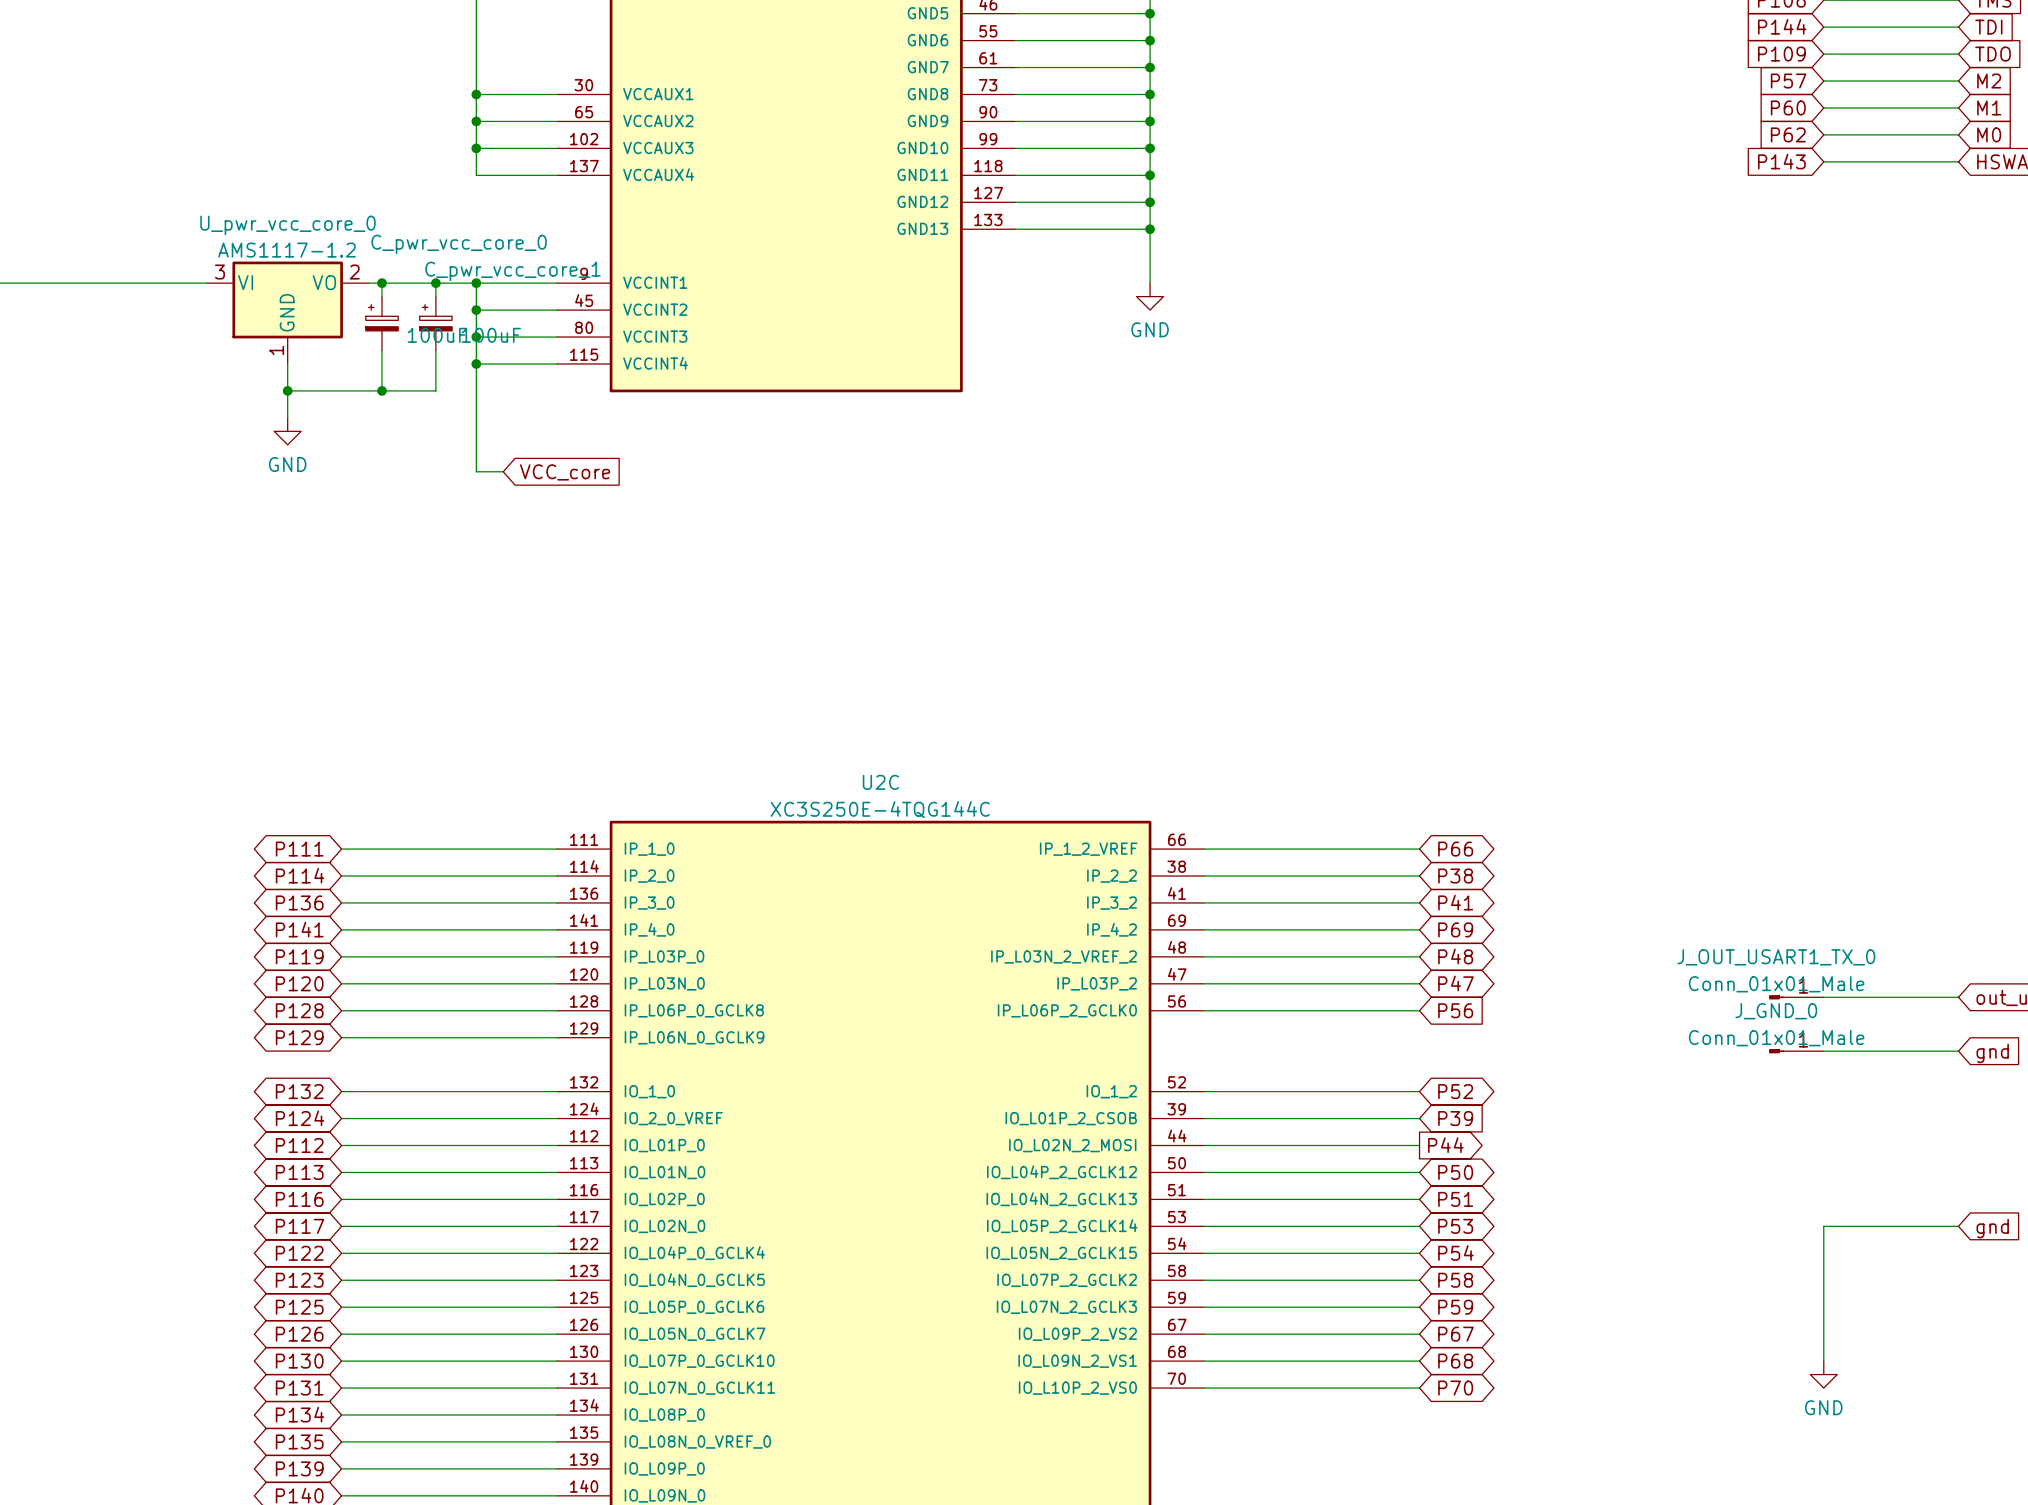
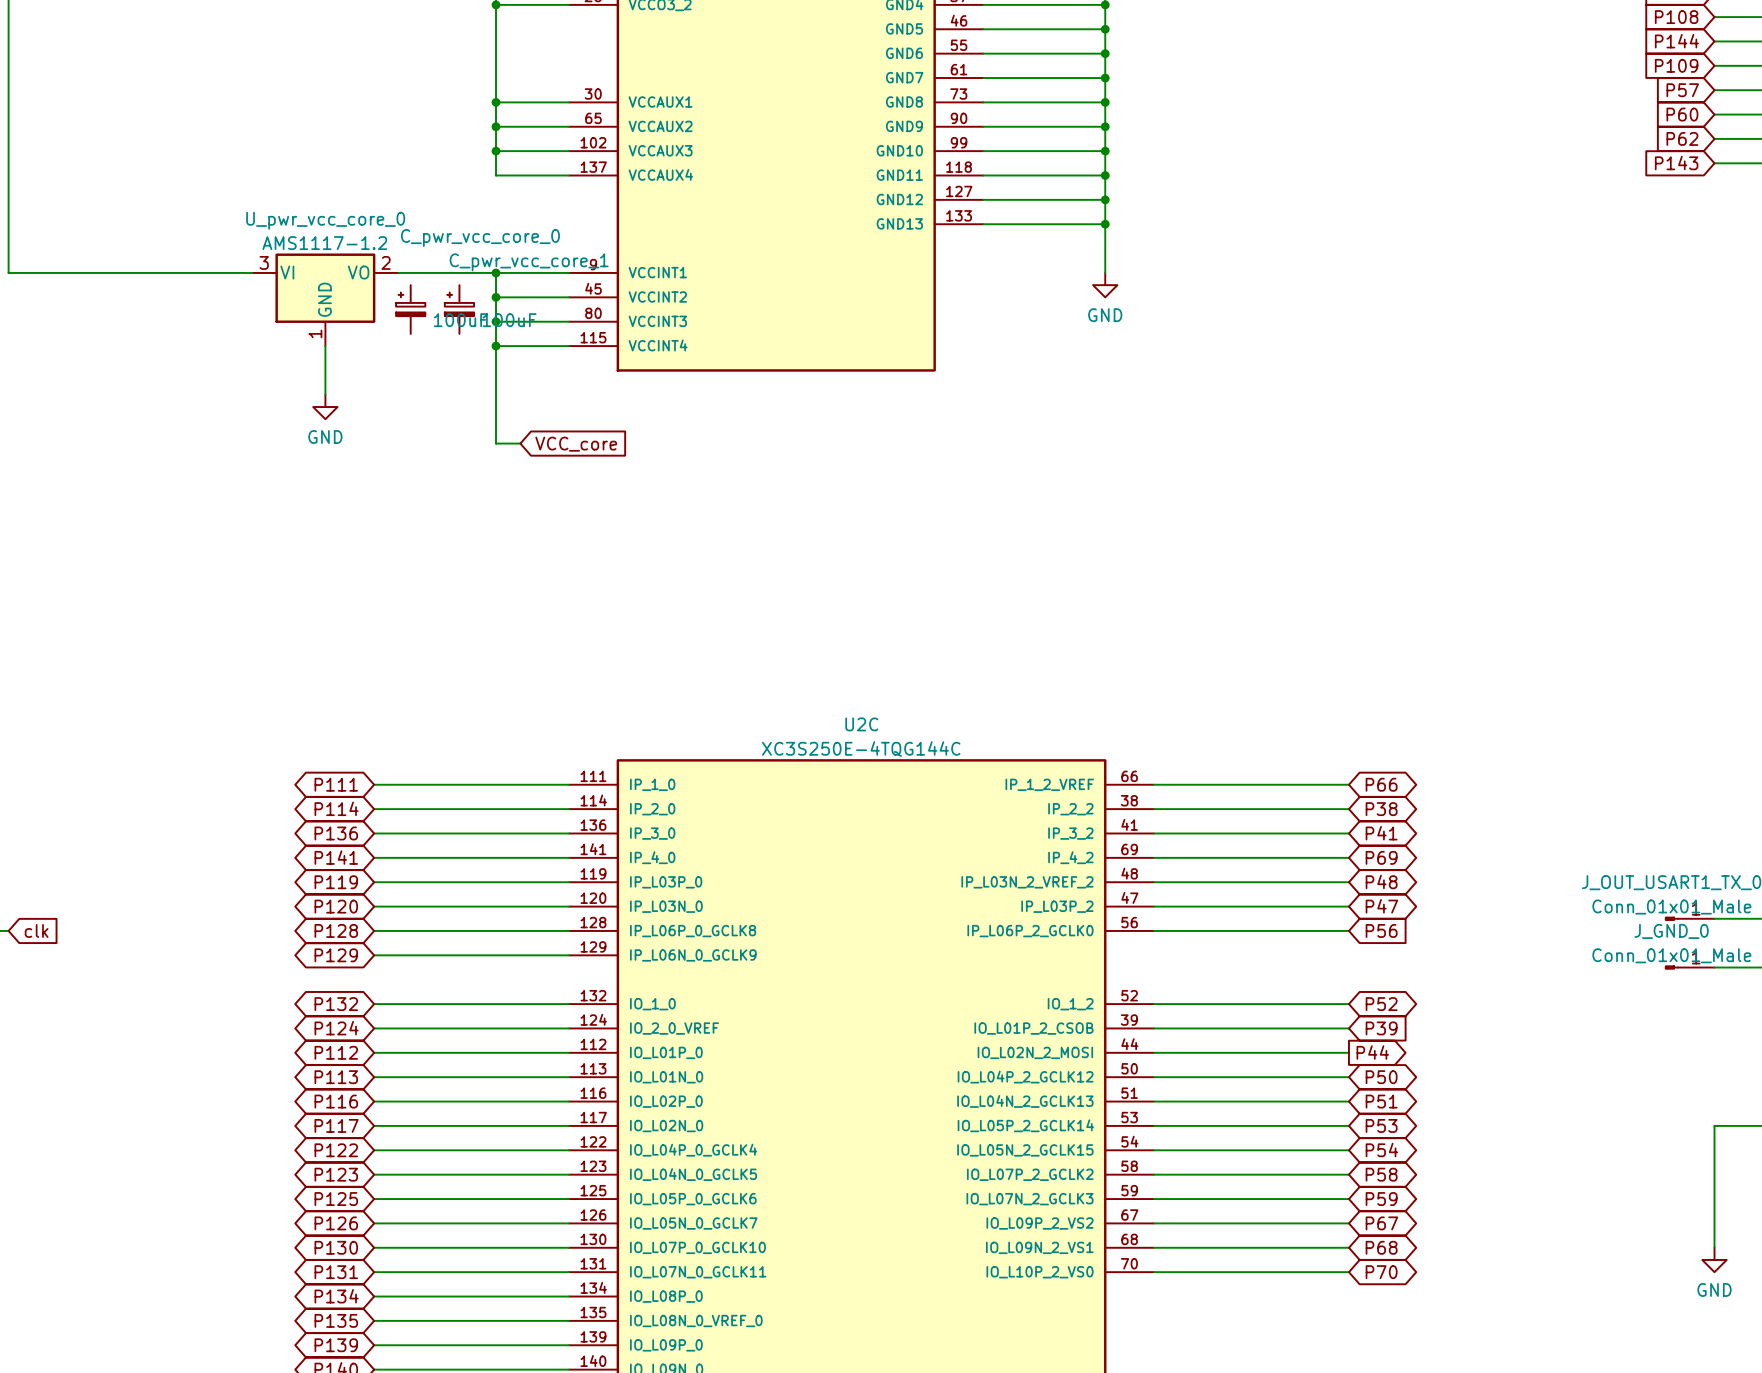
wire: (382, 283) (382, 296) -> none
junction: (382, 283) -> none
wire: (435, 283) (435, 296) -> none
junction: (435, 283) -> none
wire: (382, 350) (382, 390) -> none
wire: (435, 350) (435, 390) (287, 390) -> none
junction: (287, 390) -> none
junction: (382, 390) -> none

